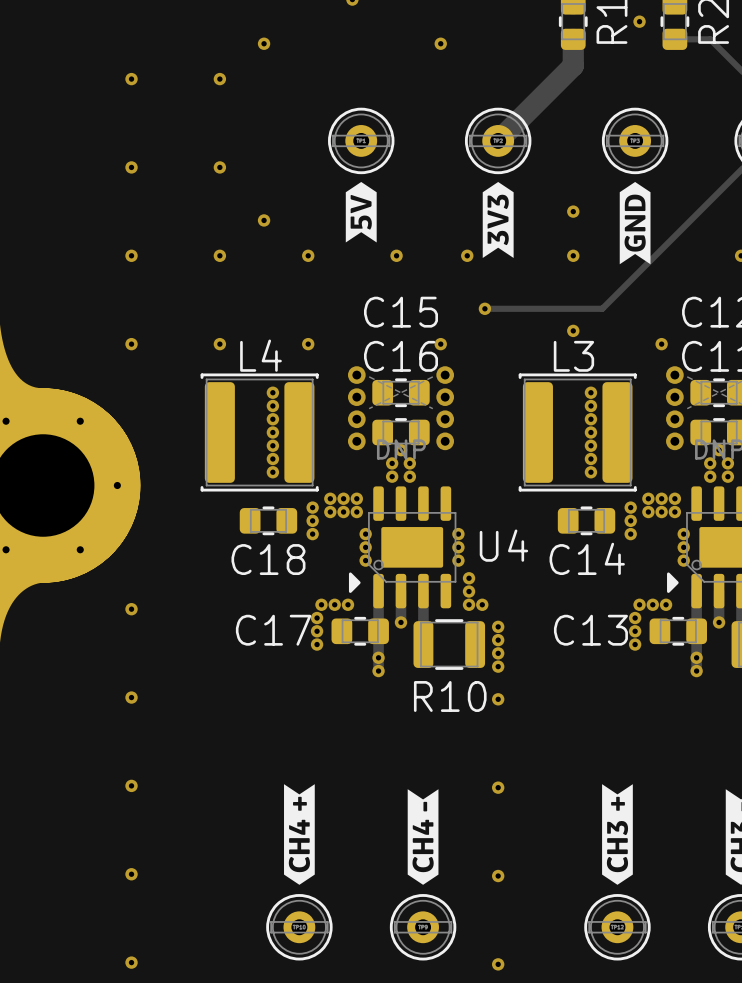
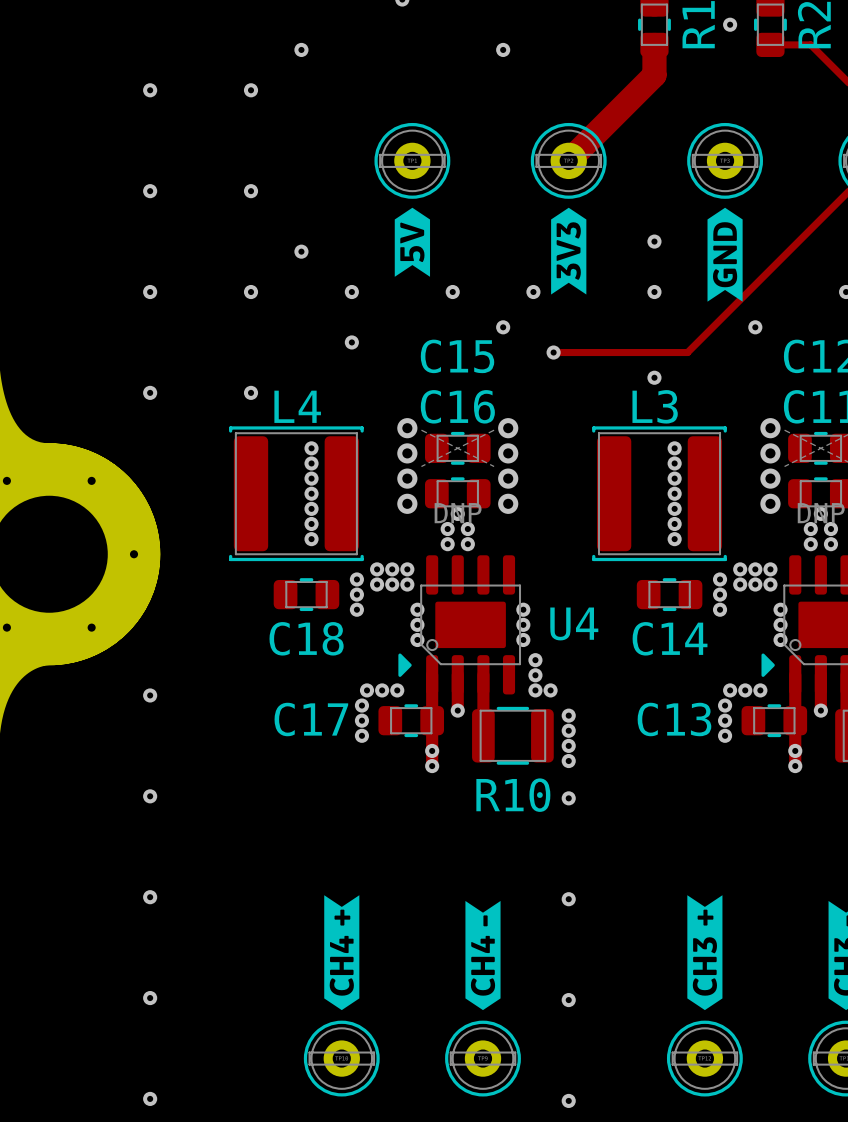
via position: (308, 344) -> (351, 342)
via position: (440, 344) -> (503, 327)
via position: (661, 344) -> (755, 327)

